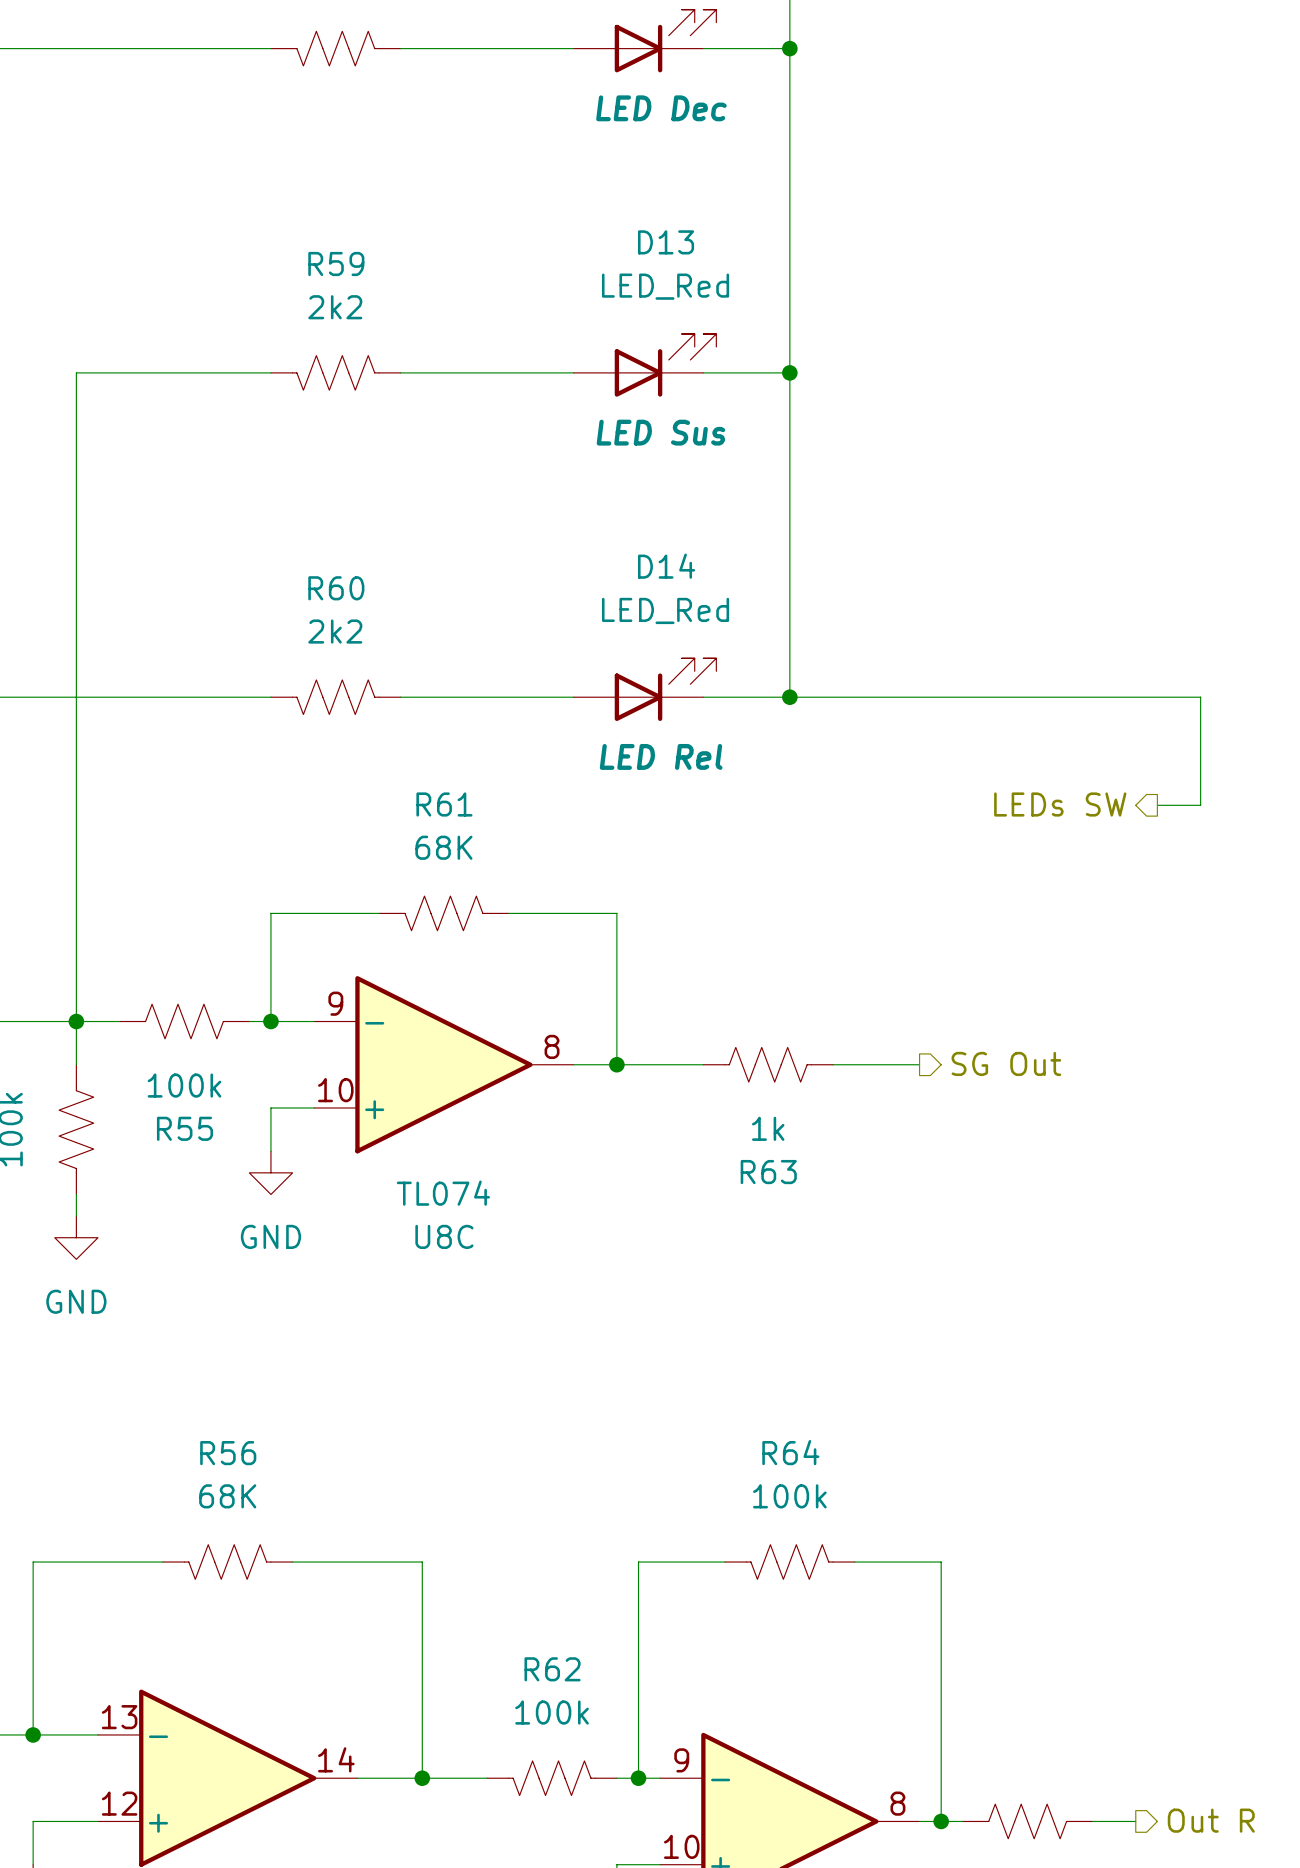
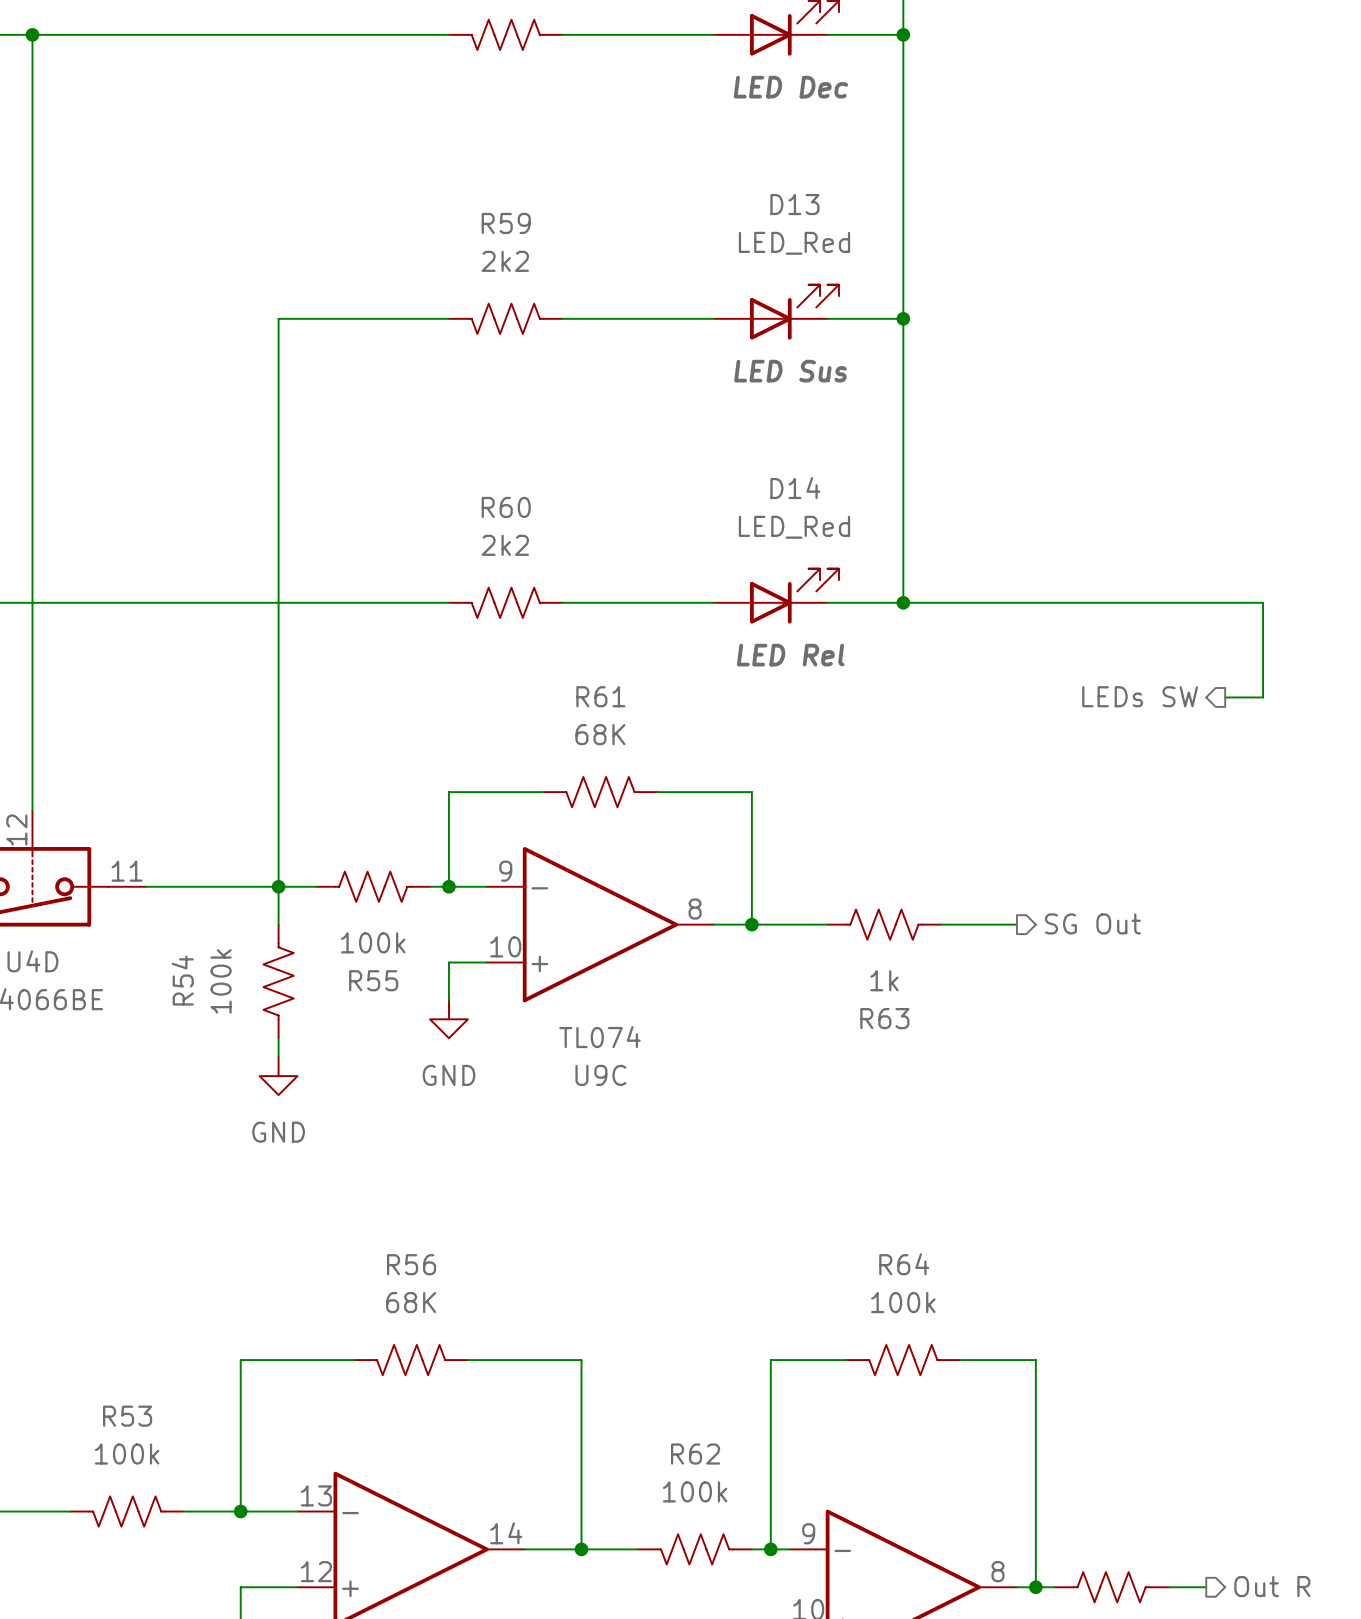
U8C name: U8C (444, 1236) -> U9C (600, 1075)

